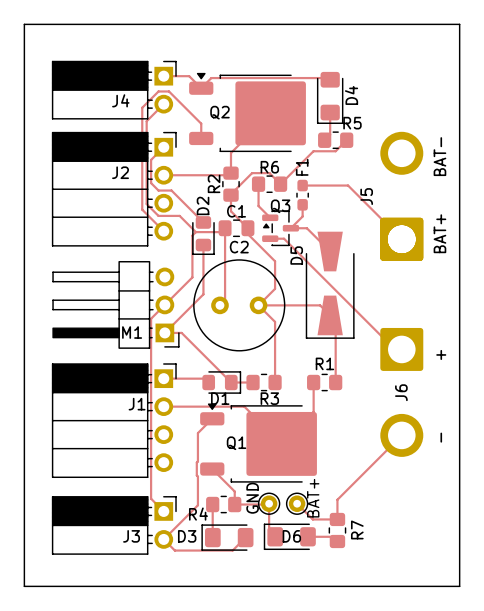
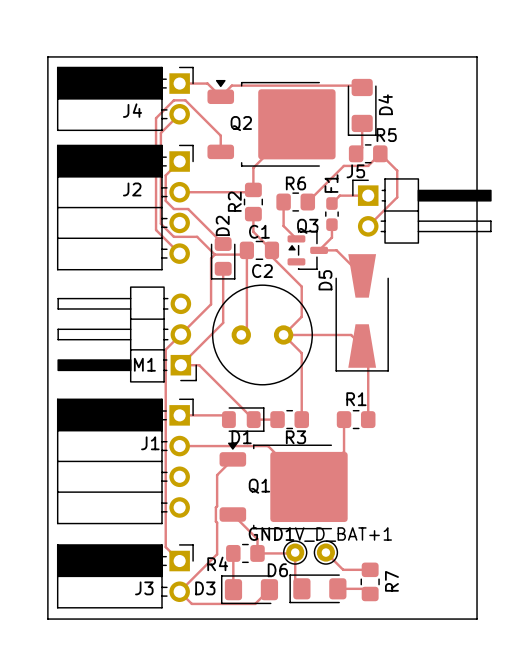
board edge: (24, 24) (459, 24) (459, 586) (24, 586) (24, 24) -> (47, 56) (47, 619) (477, 619) (477, 56) (47, 56)
J5 footprint: [380, 131, 424, 261] -> [352, 178, 492, 244]
track: none -> (380, 153) (397, 170) (397, 197) (368, 226)
text: BAT- (439, 156) -> none
track: (280, 184) (269, 173) (252, 173) (230, 195) -> none
track: (302, 185) (348, 185) (401, 239) -> (331, 203) (339, 195) (368, 195)
J5 name position: J5 (366, 196) -> J5 (355, 171)
text: BAT+ (439, 233) -> none
track: (270, 238) (284, 238) (394, 349) (401, 349) -> none
part: (401, 239) -> none
text: + (441, 354) -> none
J6: (401, 392) -> none
track: (401, 435) (337, 499) (337, 519) -> none
text: - (441, 437) -> none
GND name: GND (252, 498) -> GND1 (271, 533)
BAT+ name: BAT+ (313, 498) -> V_D_BAT+1 (343, 534)
D6 name position: D6 (291, 536) -> D6 (277, 570)

